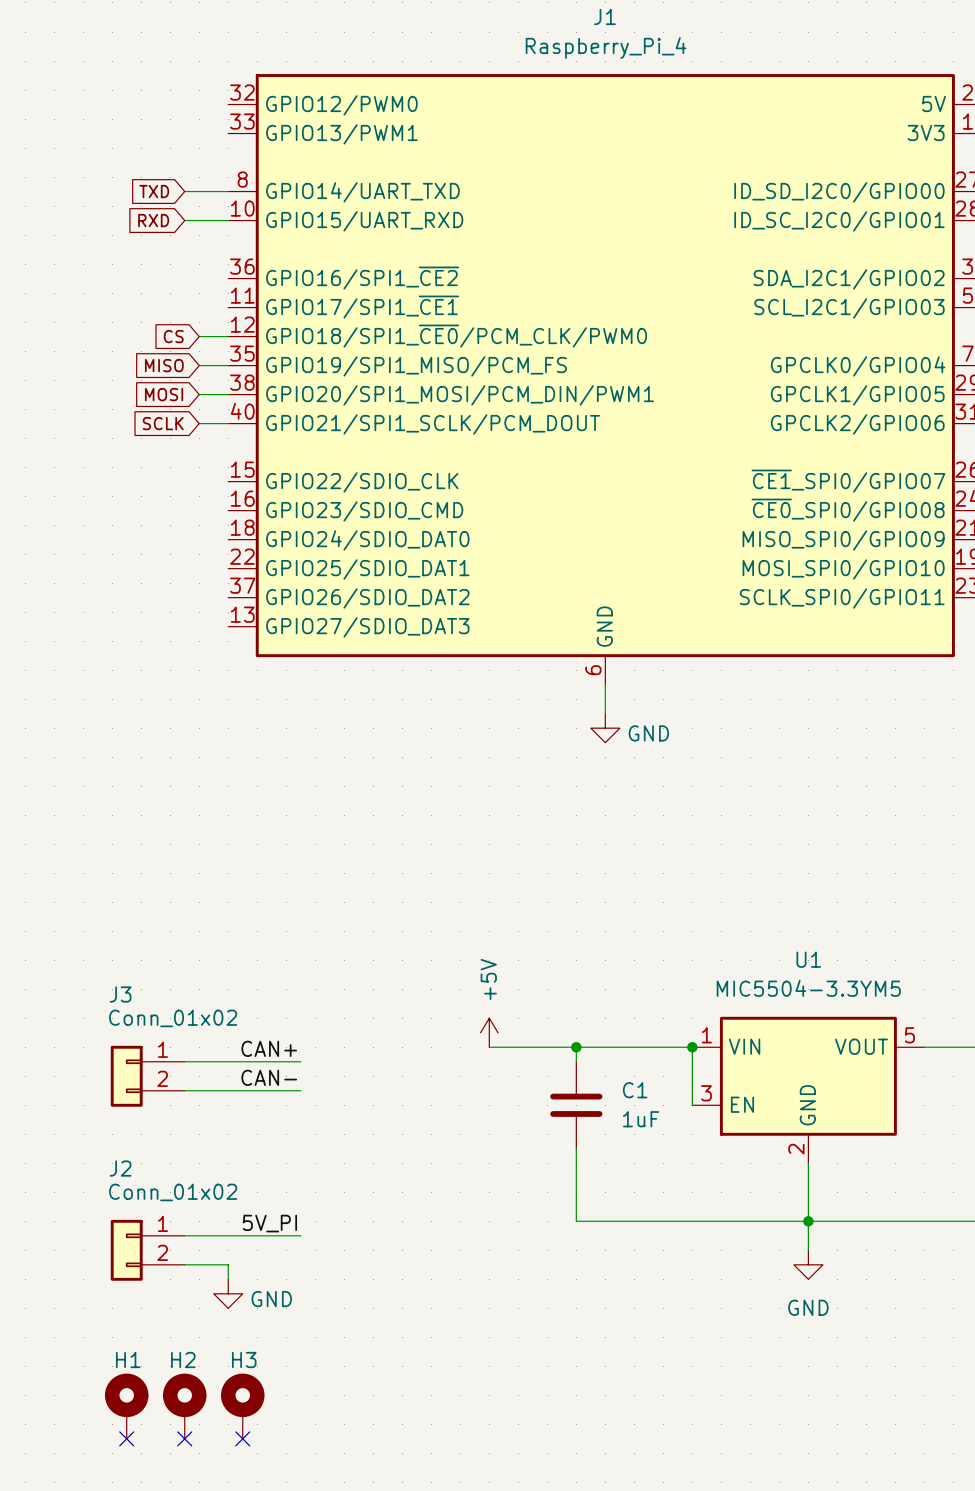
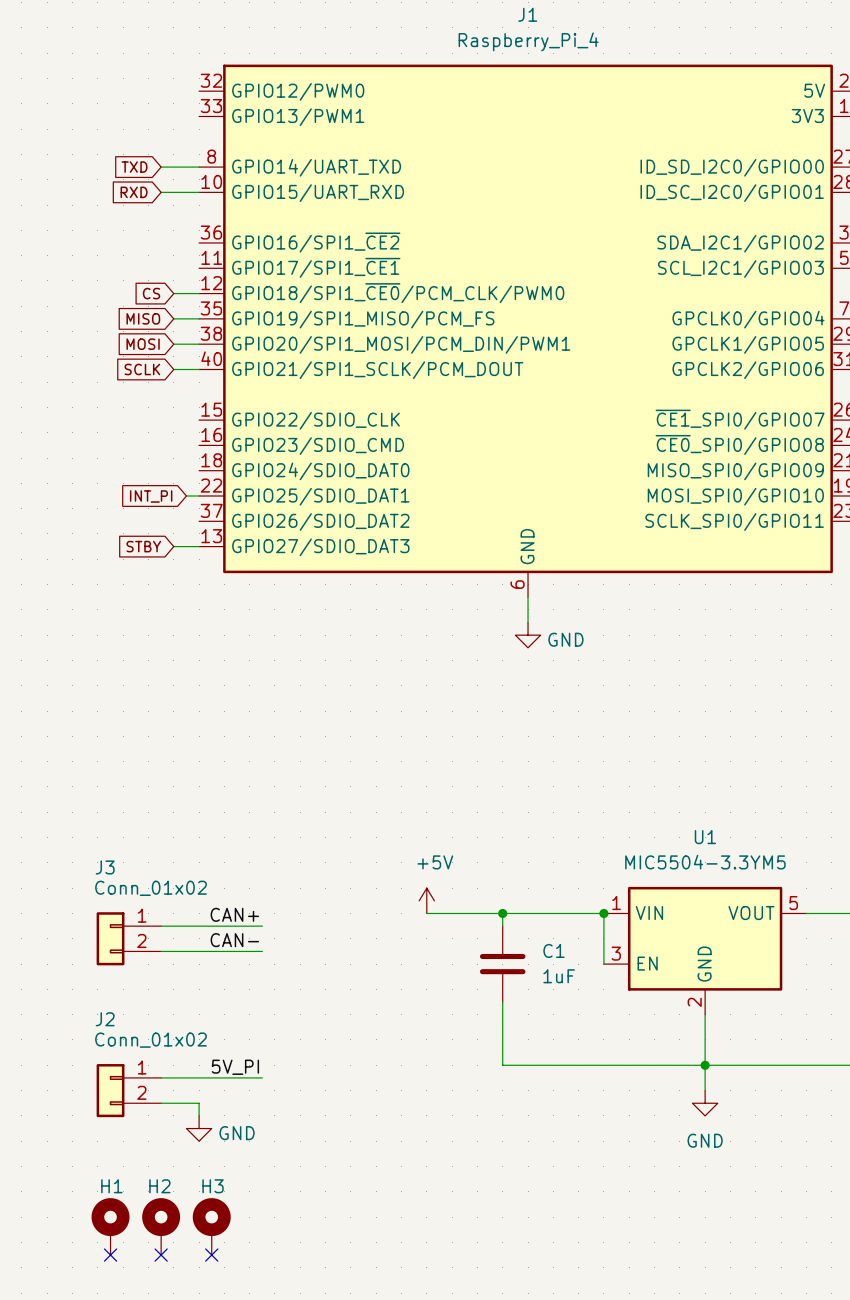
wire: none -> (186, 496) (199, 496)
global label: none -> INT_PI (151, 496)
global label: none -> STBY (143, 546)
wire: none -> (173, 546) (199, 546)
power symbol text rotation: 0° (488, 979) -> 90° clockwise (435, 862)

